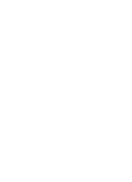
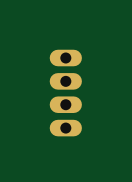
part: none -> (65, 93)

